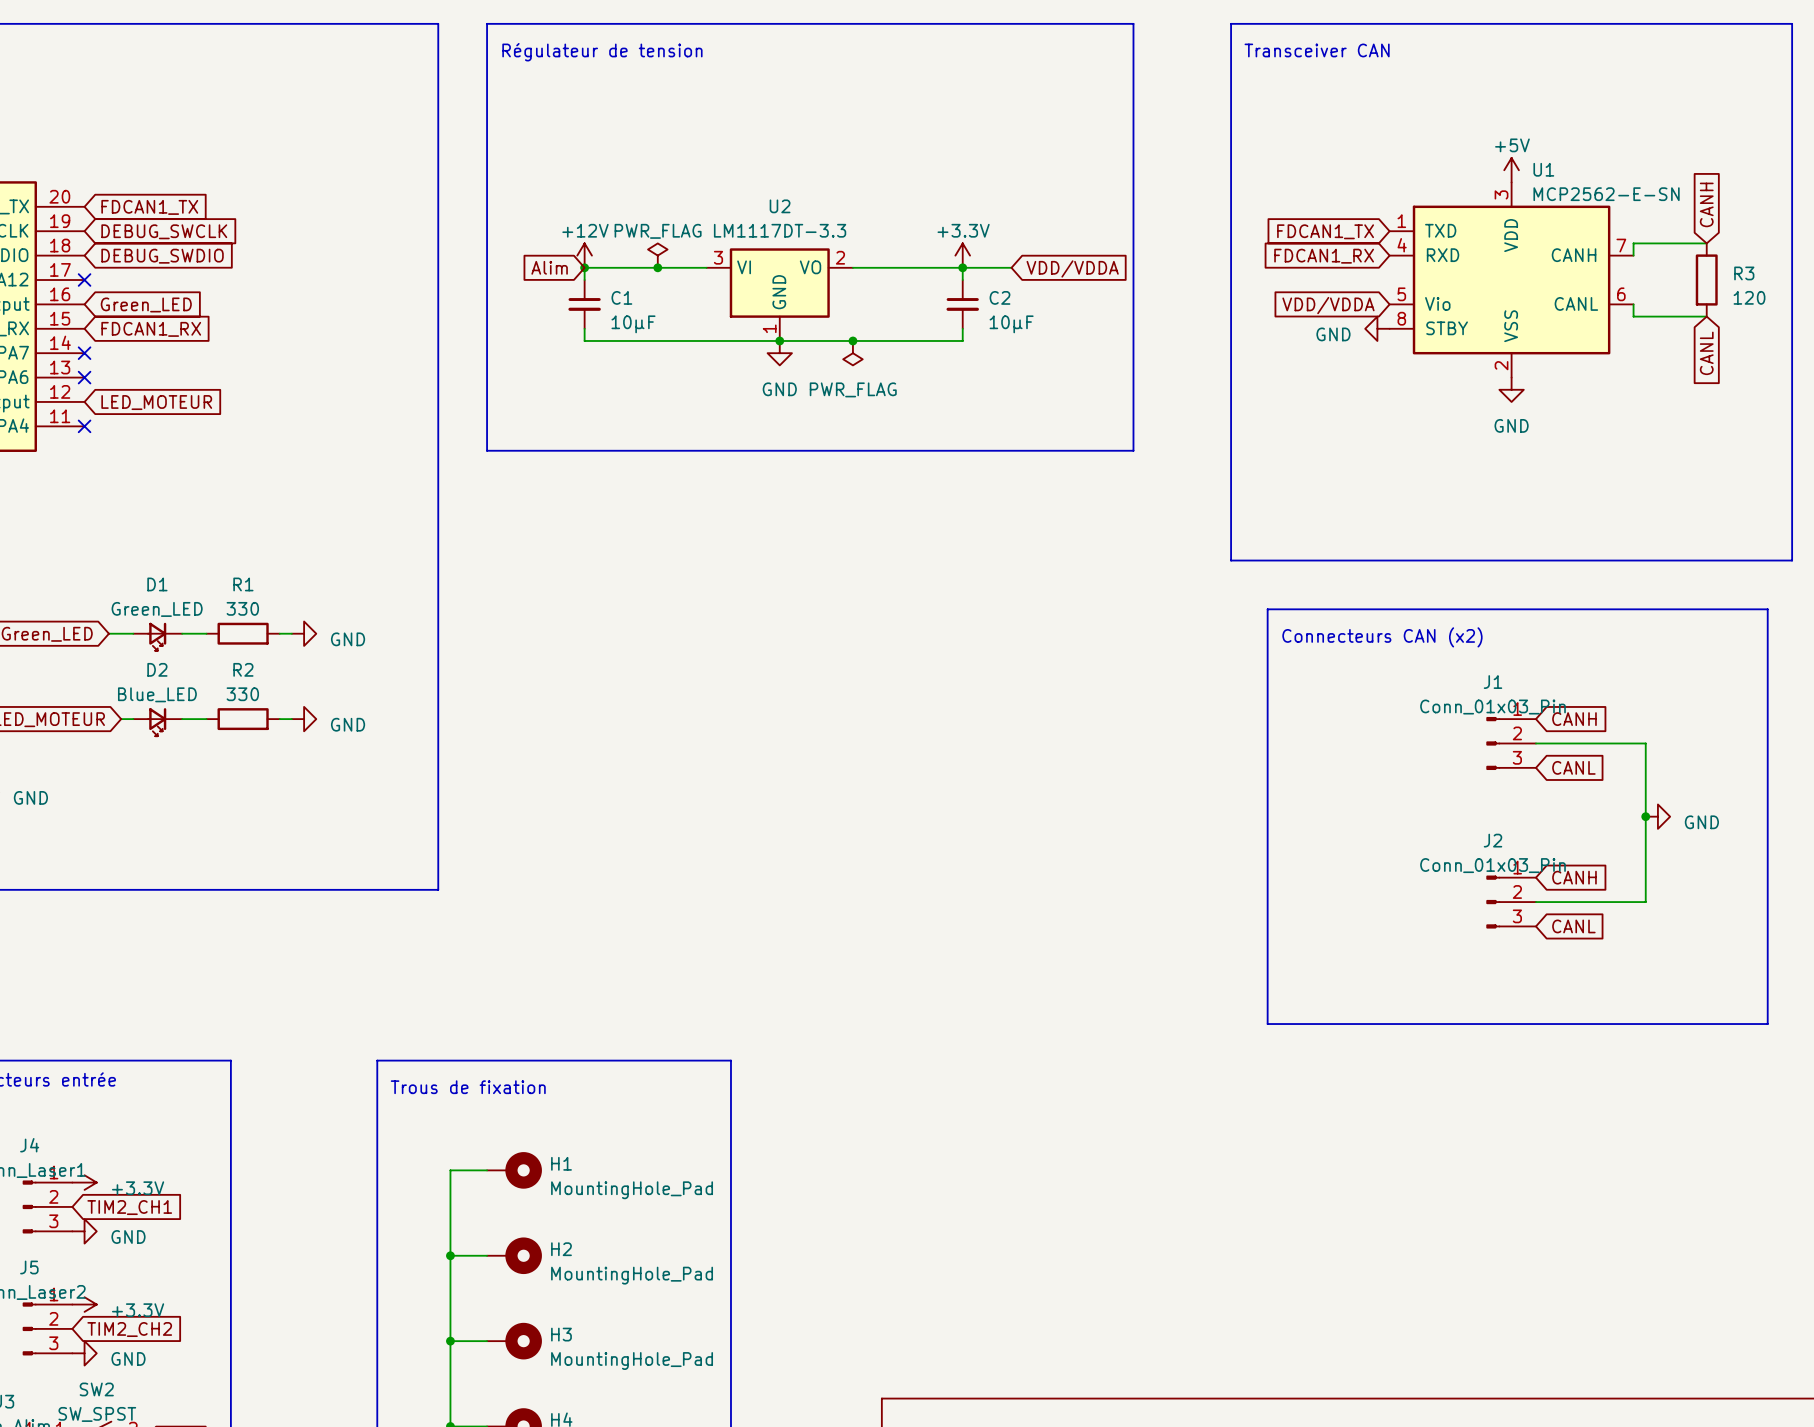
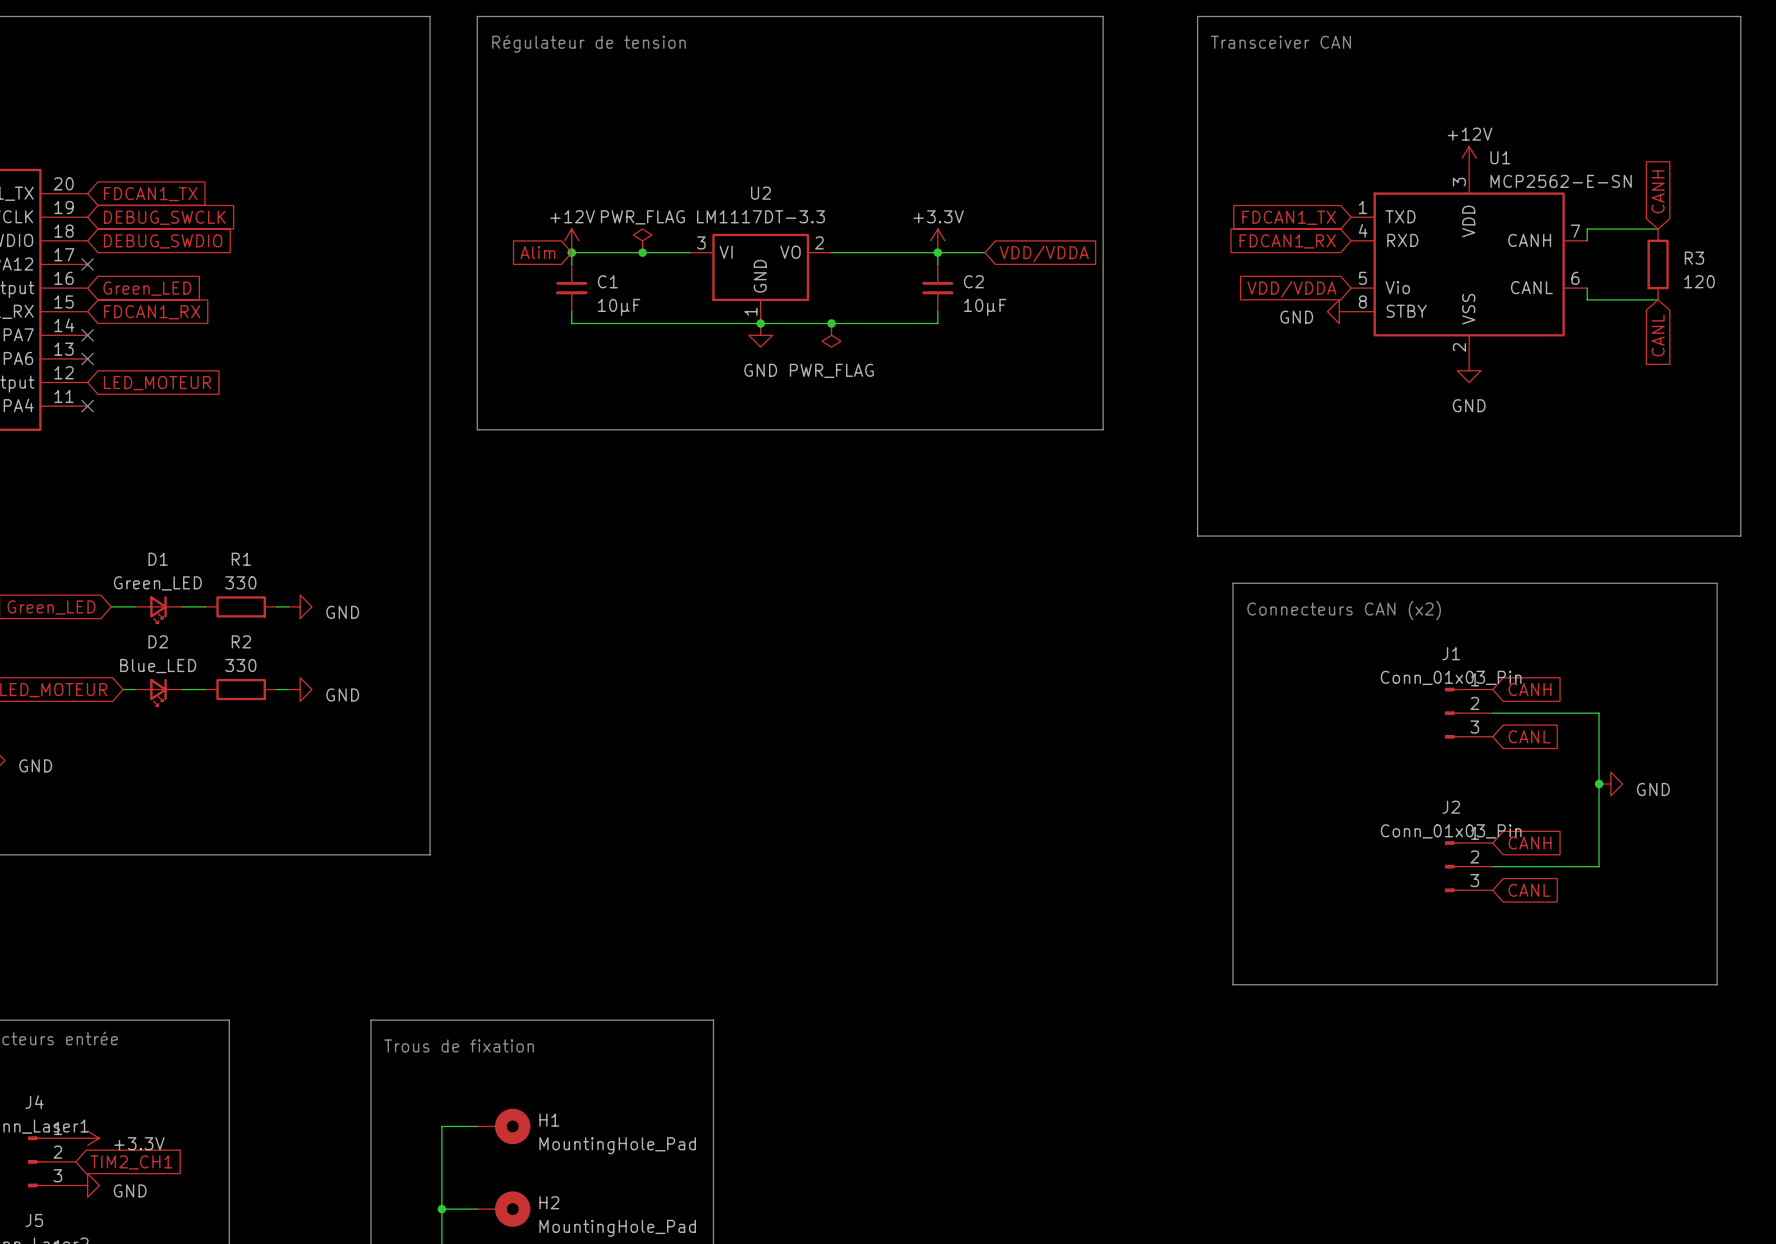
power symbol: +5V (1511, 170) -> +12V (1469, 158)

